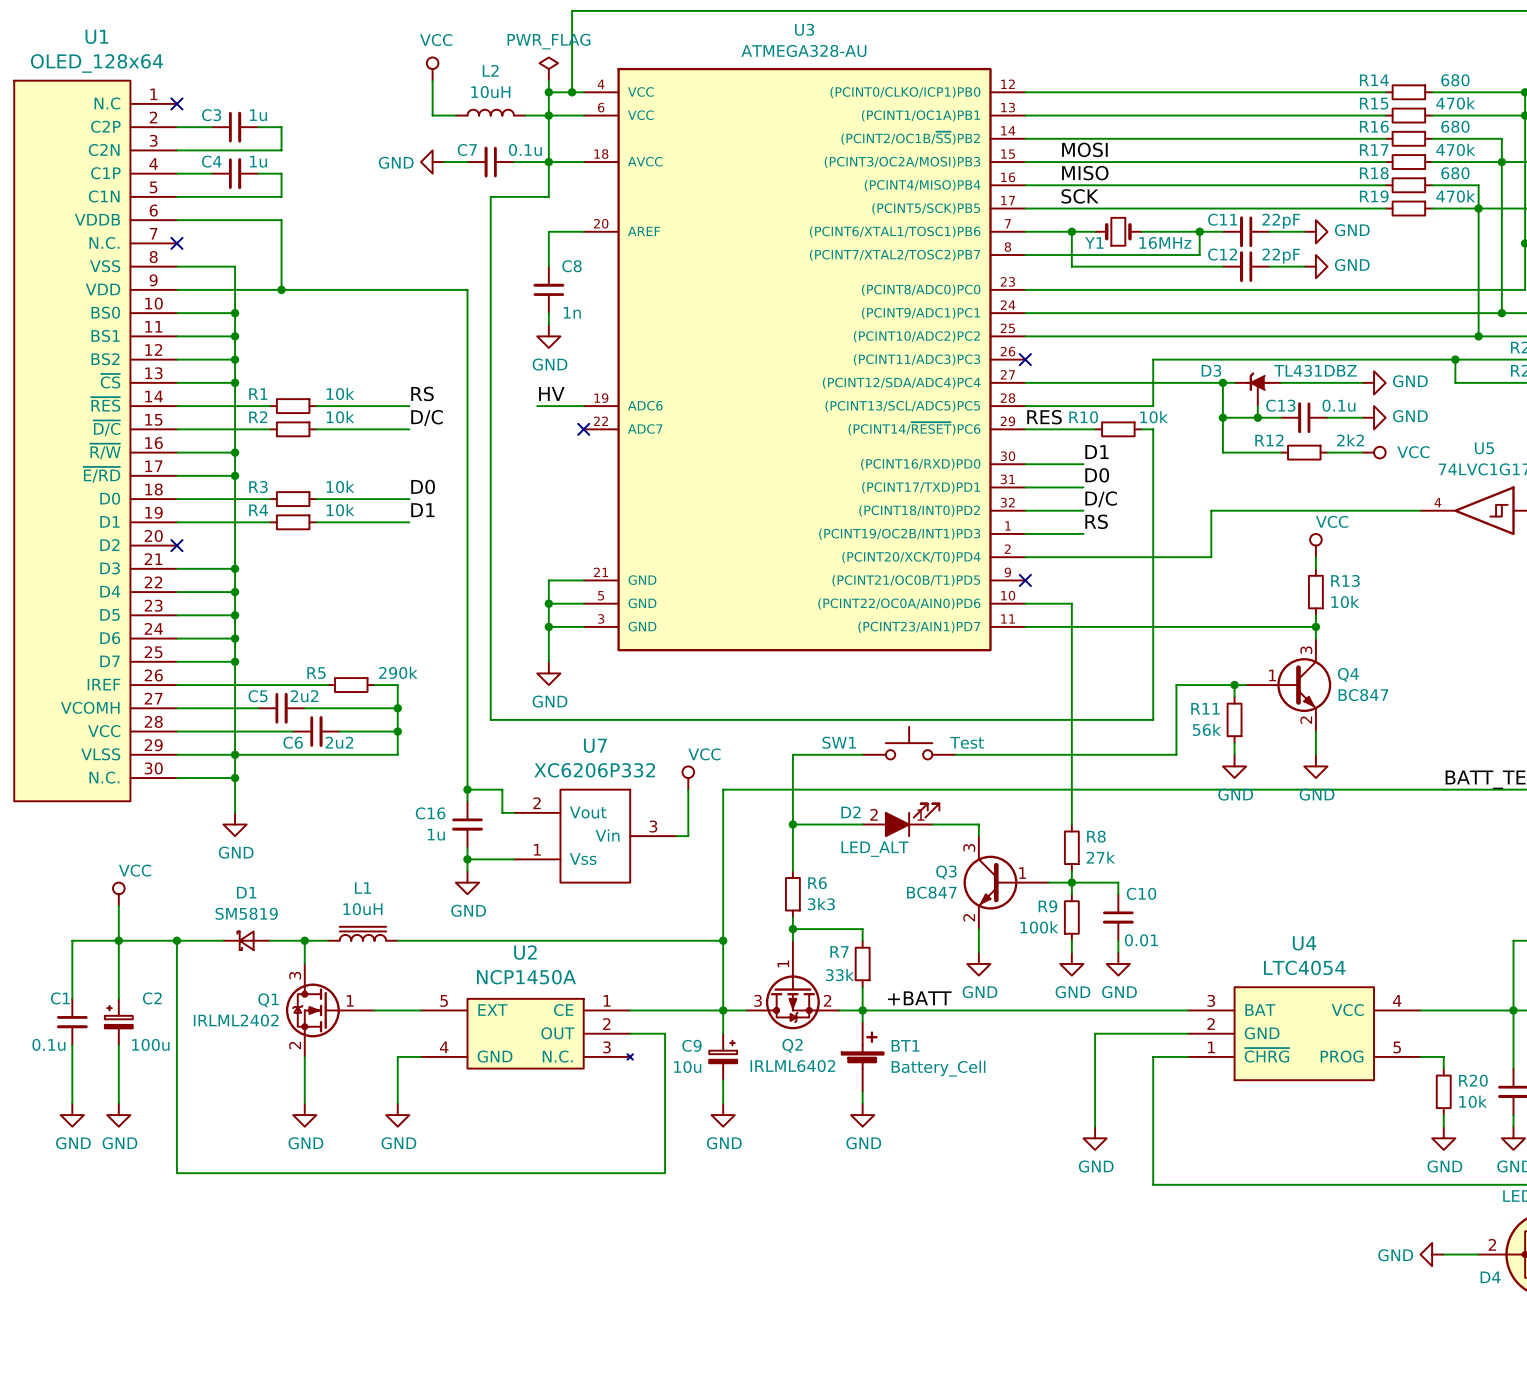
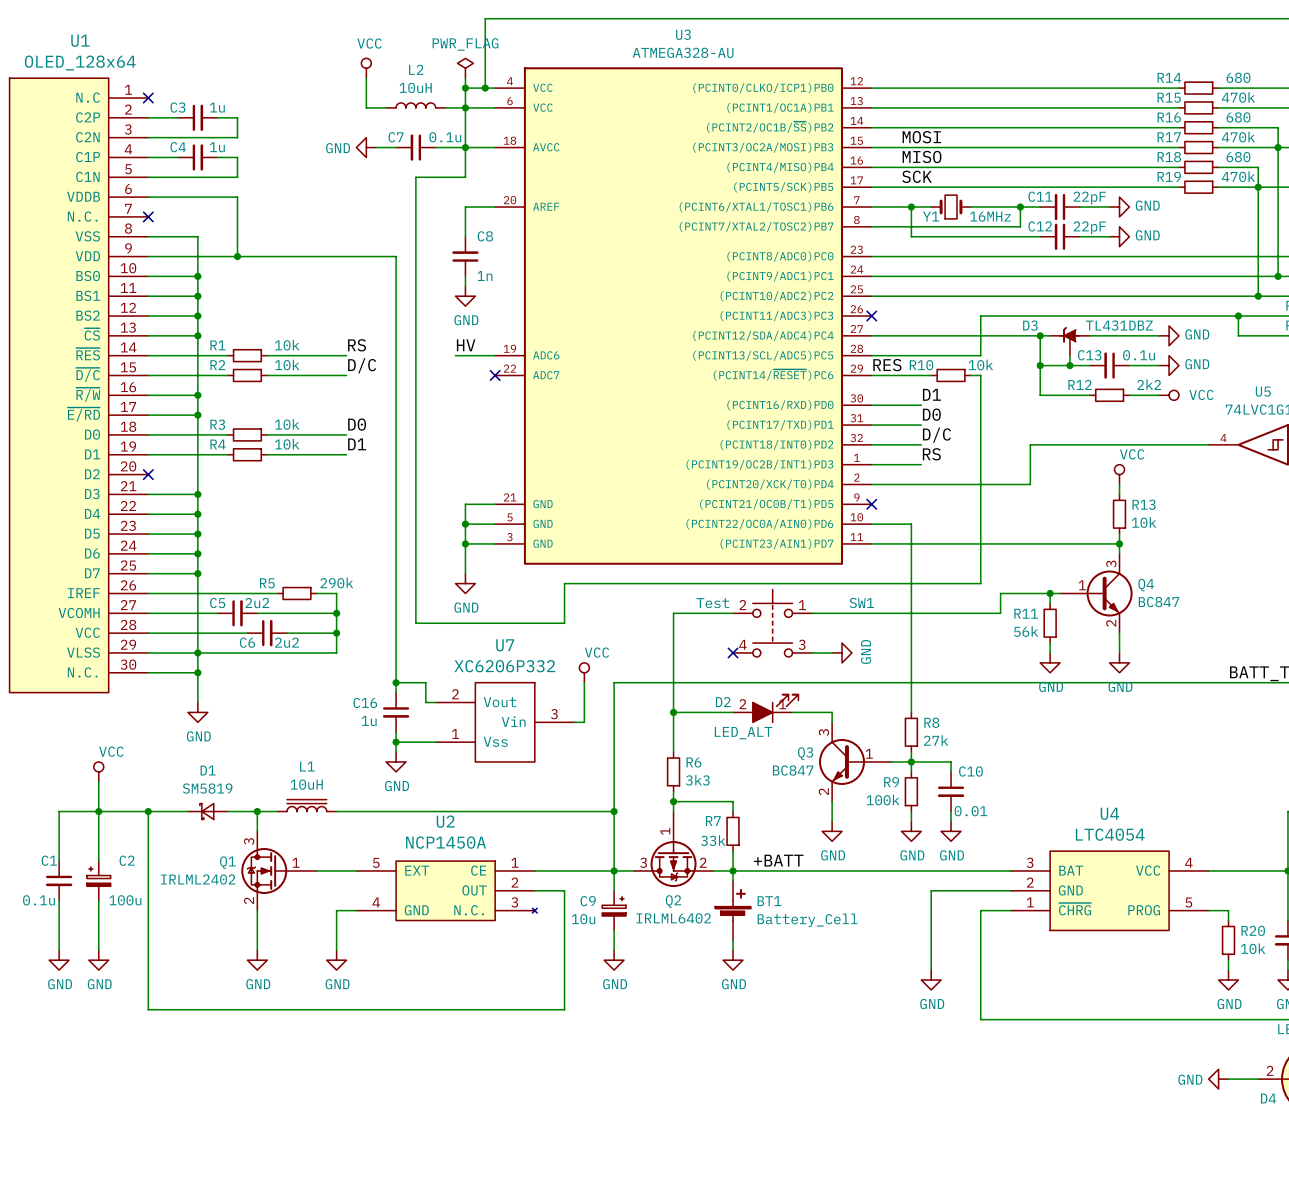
wire: (1153, 673) (1153, 719) (665, 719) -> (980, 583) (564, 583) (564, 623)
wire: (1176, 708) (1176, 754) (978, 754) -> (1000, 613) (812, 613)
SW1 symbol: [862, 726, 956, 760] -> [733, 589, 813, 657]
SW1 name position: SW1 (839, 742) -> SW1 (861, 603)
SW1 value position: Test (967, 742) -> Test (712, 603)
wire: (792, 754) (862, 754) -> (673, 652) (673, 613) (733, 613)
no-connect mark: none -> (733, 652)
power symbol: none -> GND (842, 652)

